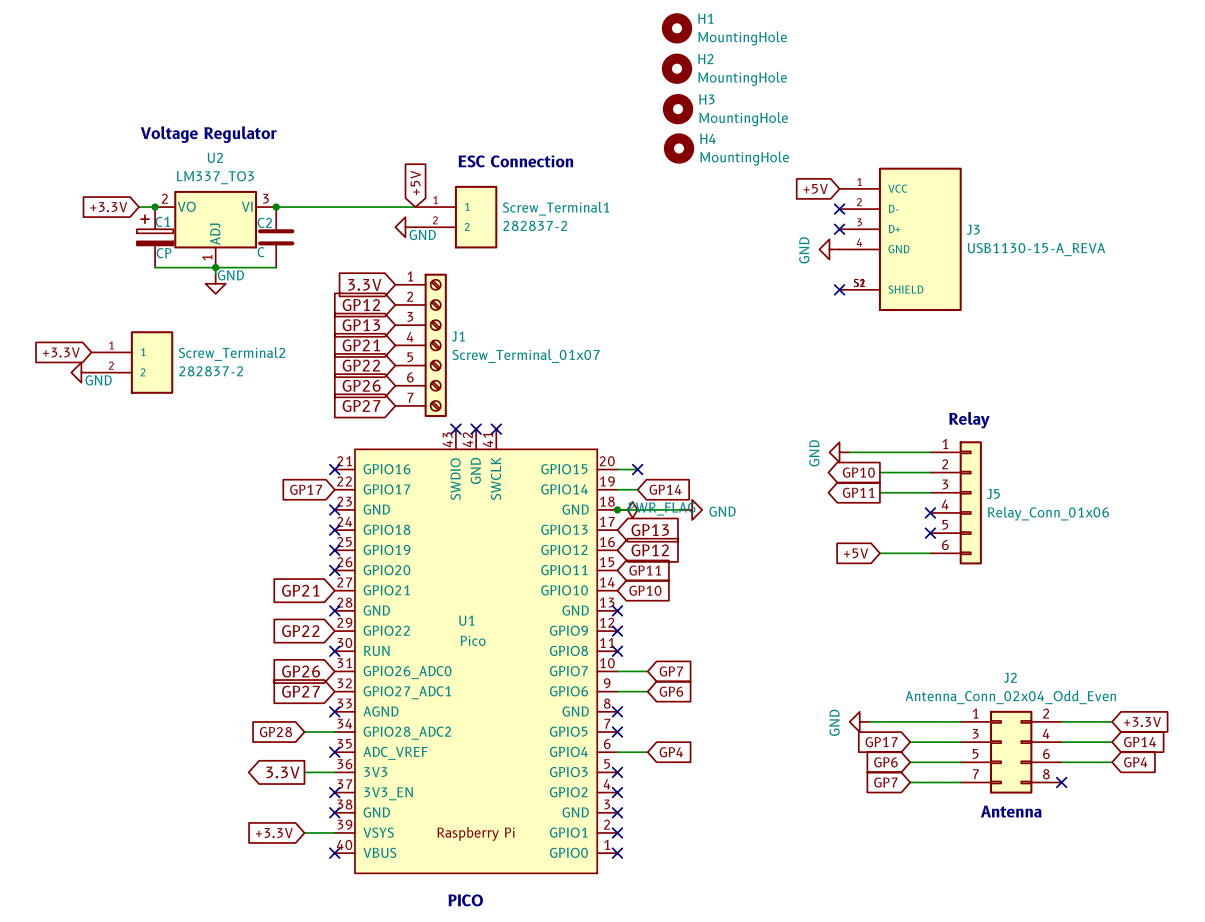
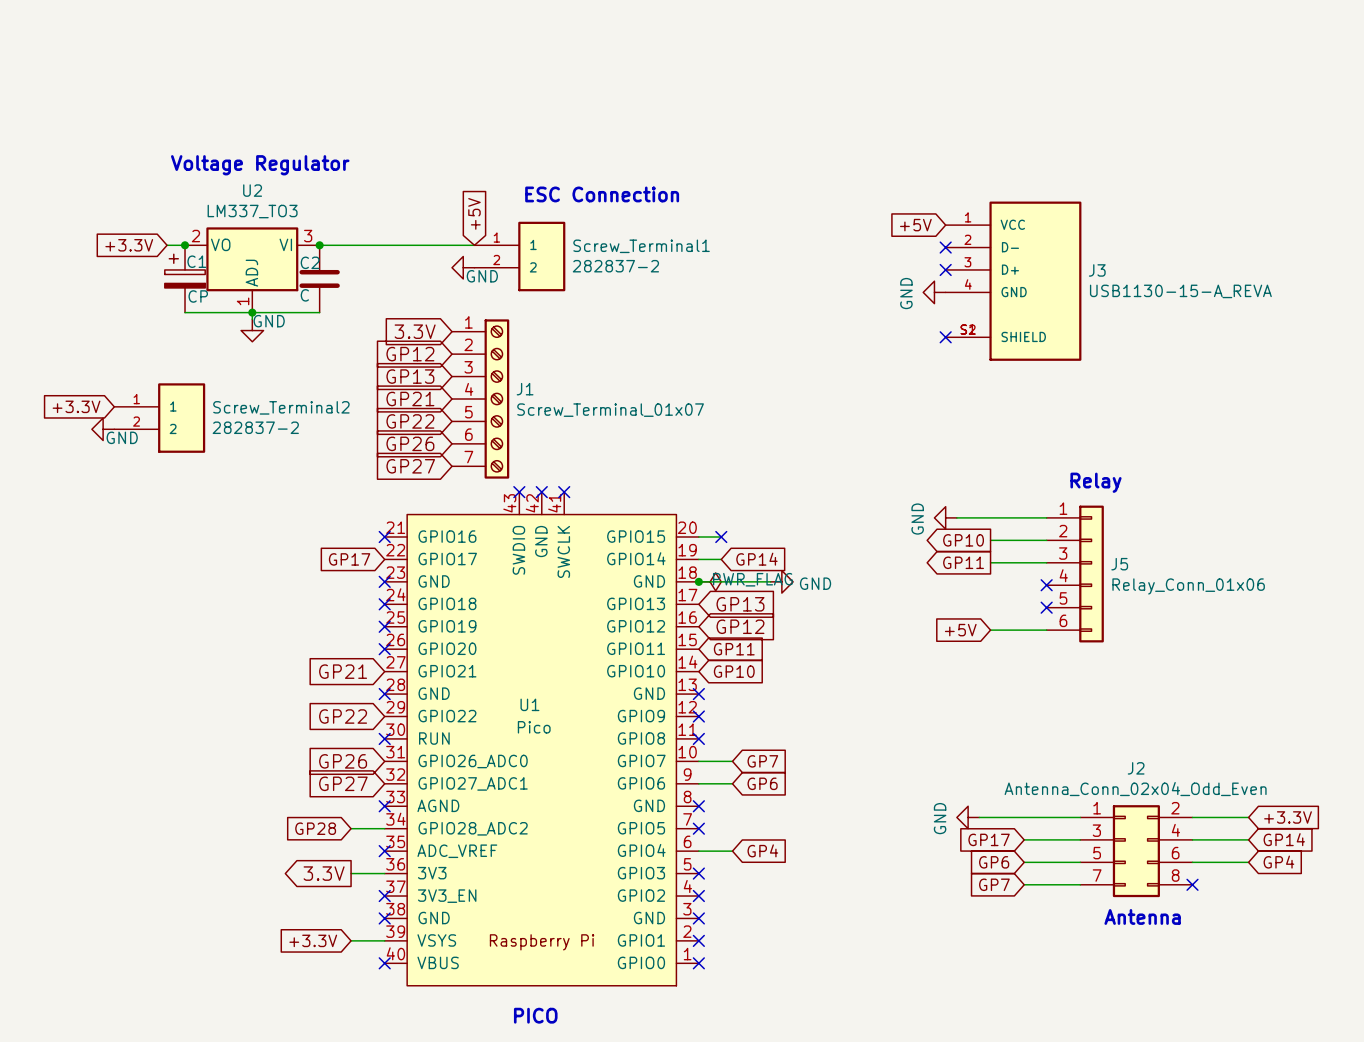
H1: MountingHole (677, 28) -> none
H2: MountingHole (677, 68) -> none
H3: MountingHole (678, 109) -> none
H4: MountingHole (679, 148) -> none

